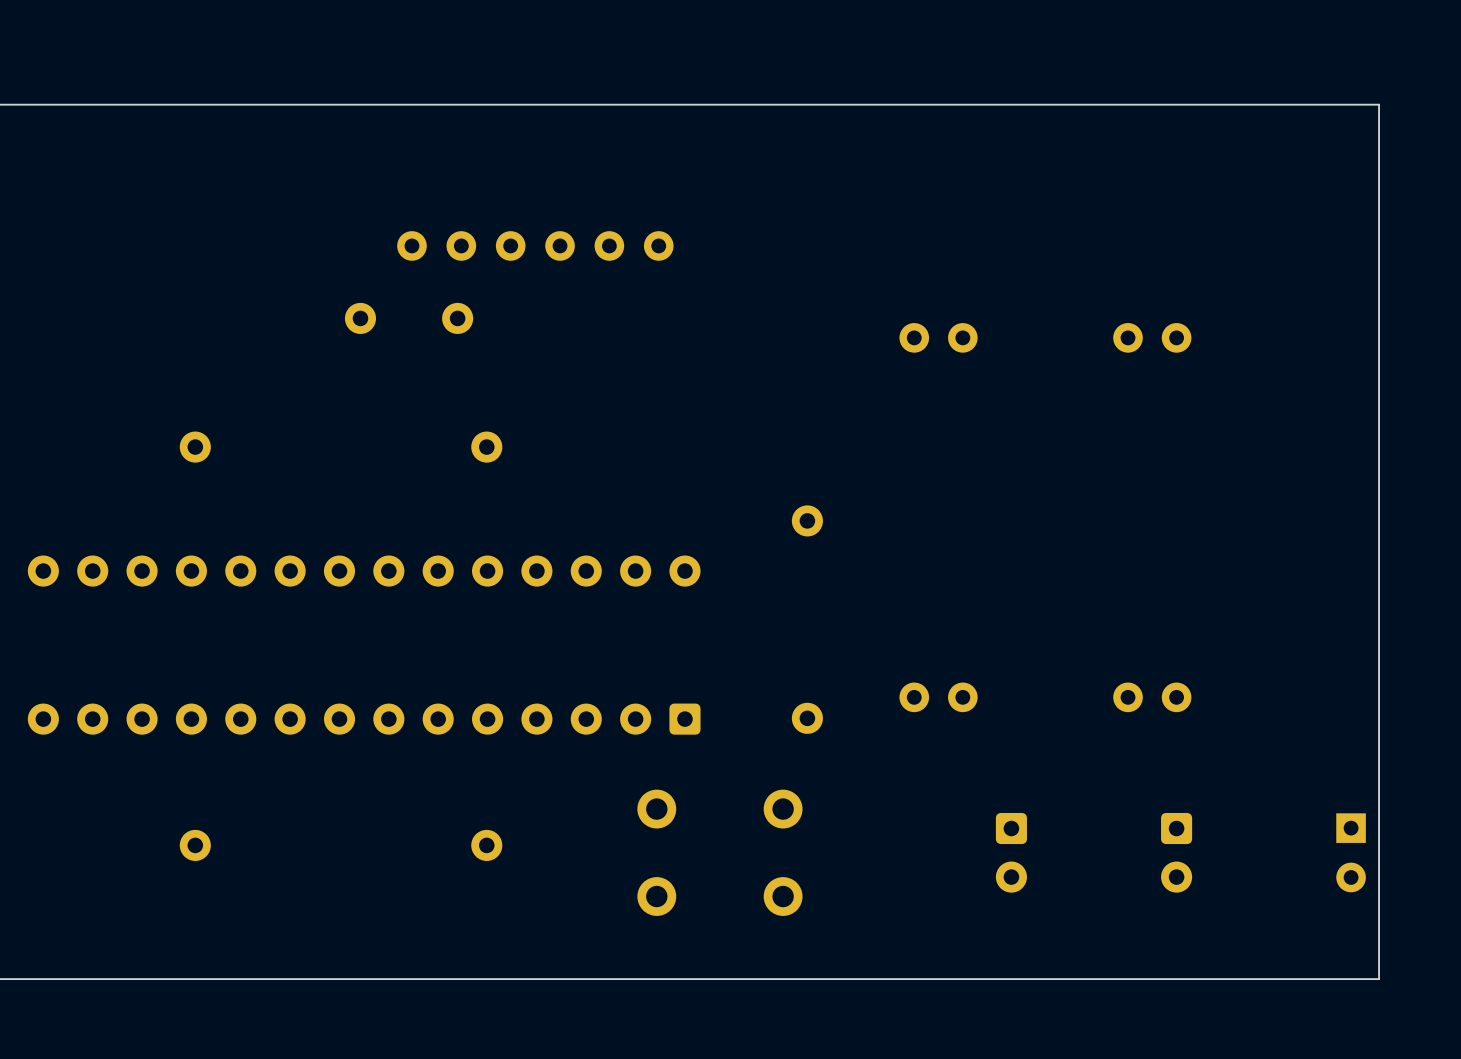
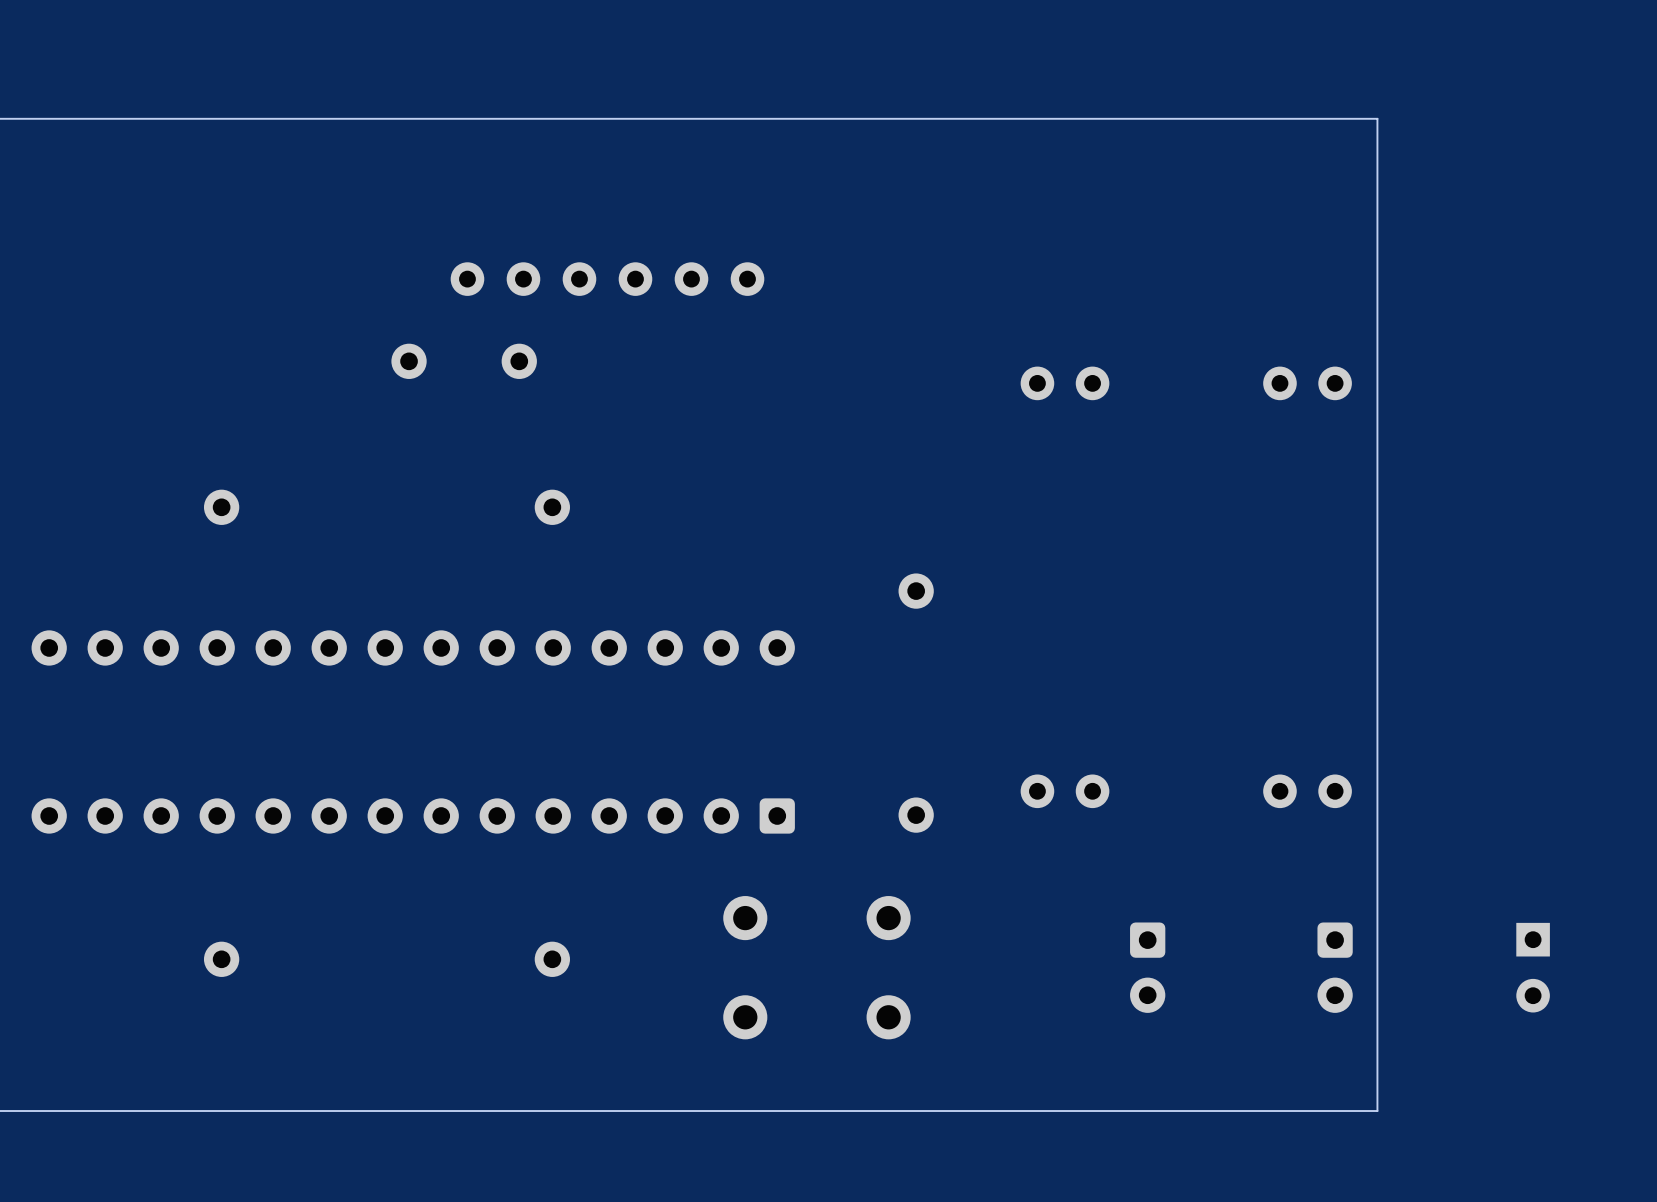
board edge: (1213, 104) (1379, 104) (1379, 979) (1213, 979) -> (1377, 118) (1377, 1111)

